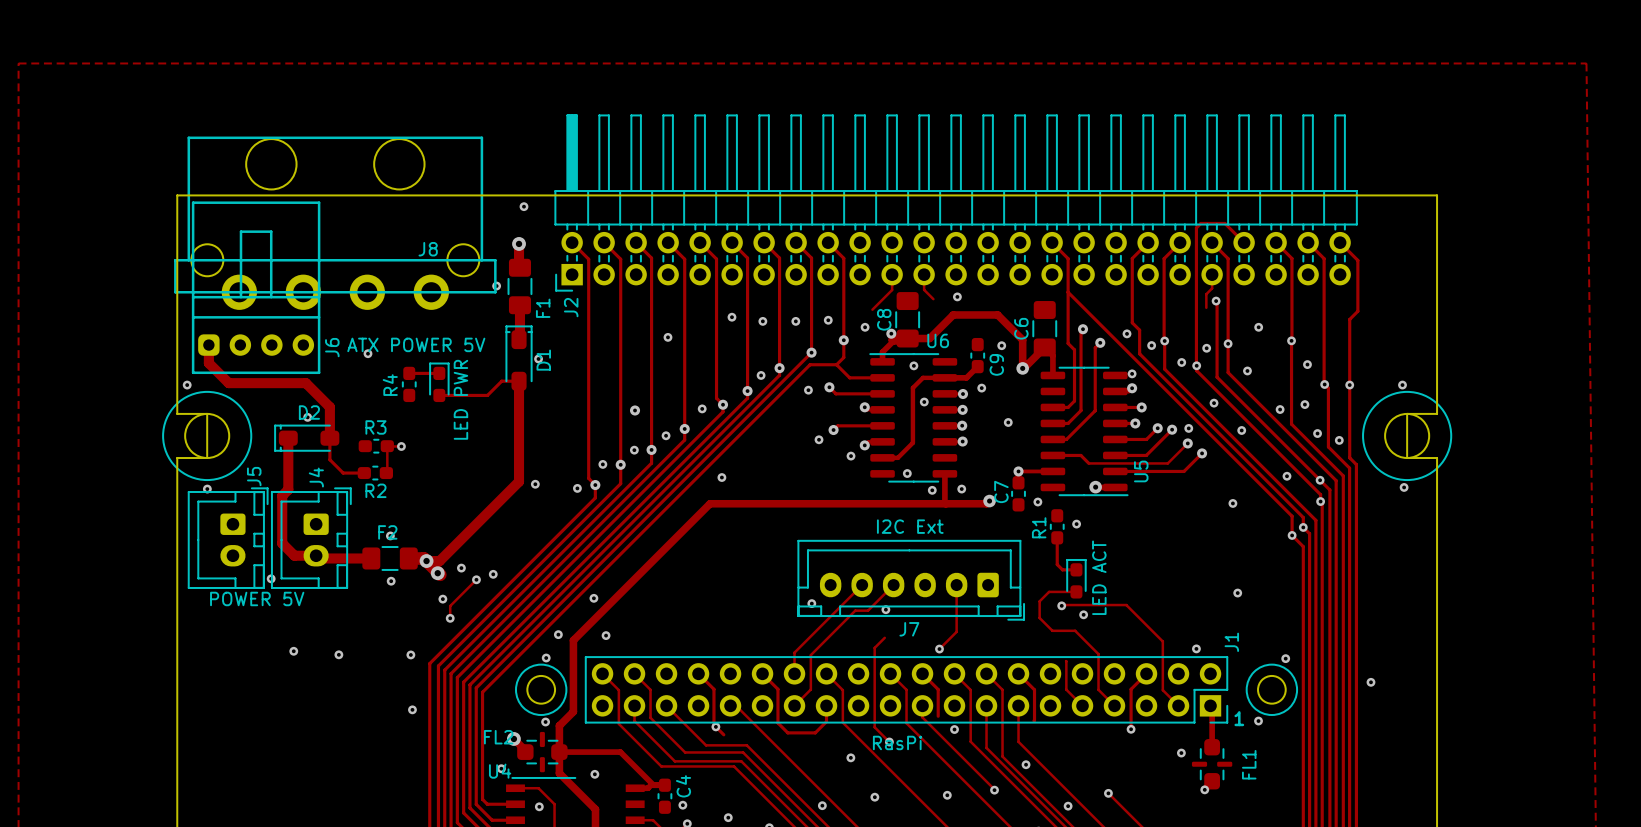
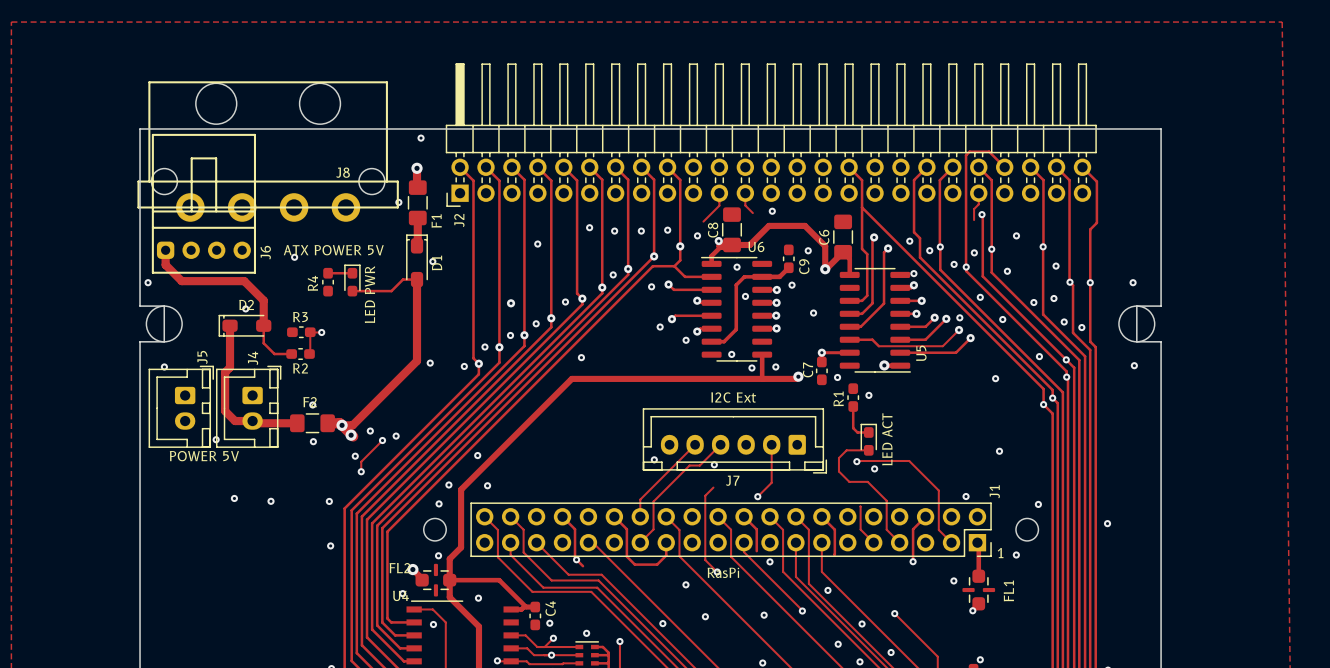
drawing: [162, 390, 253, 482] -> none
drawing: [1362, 390, 1453, 482] -> none
drawing: [515, 663, 568, 716] -> none
drawing: [1245, 663, 1299, 716] -> none

